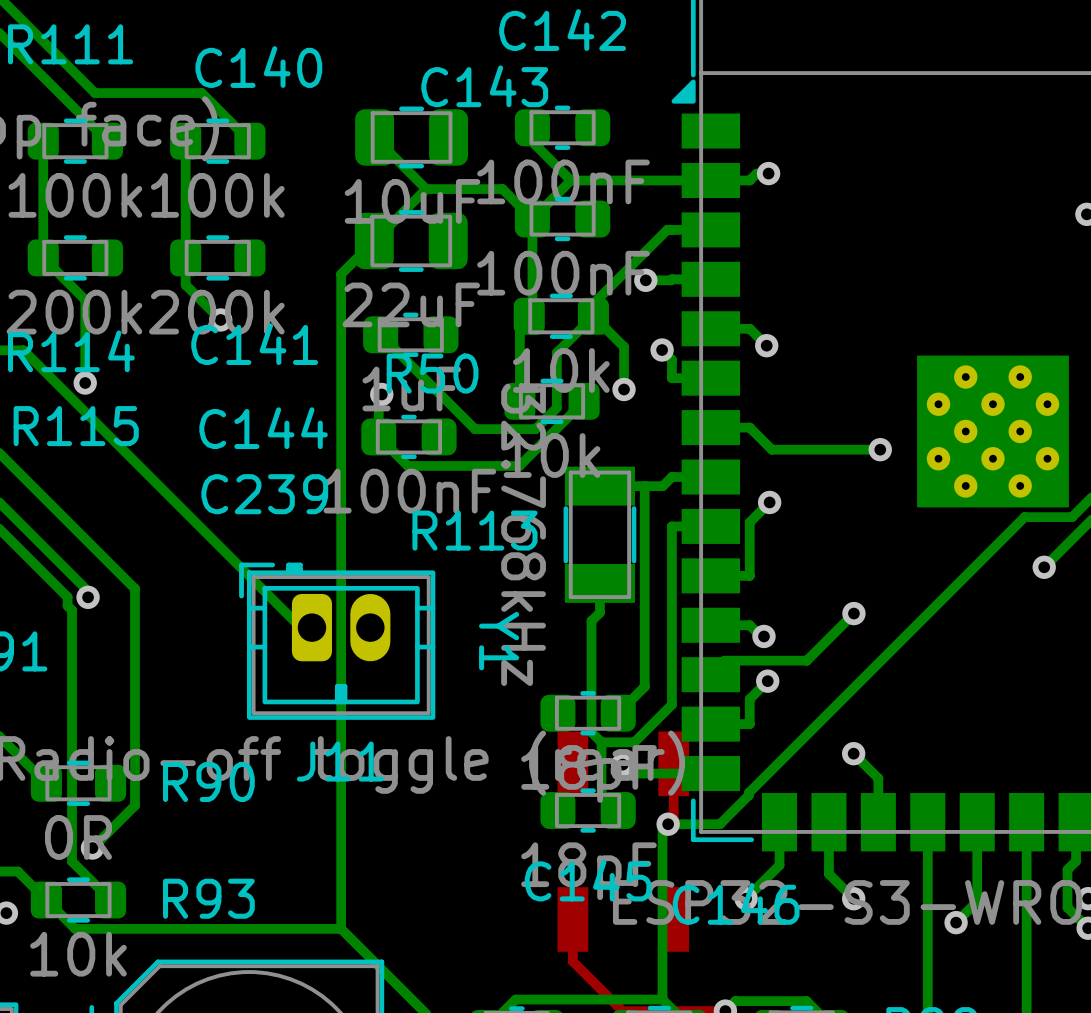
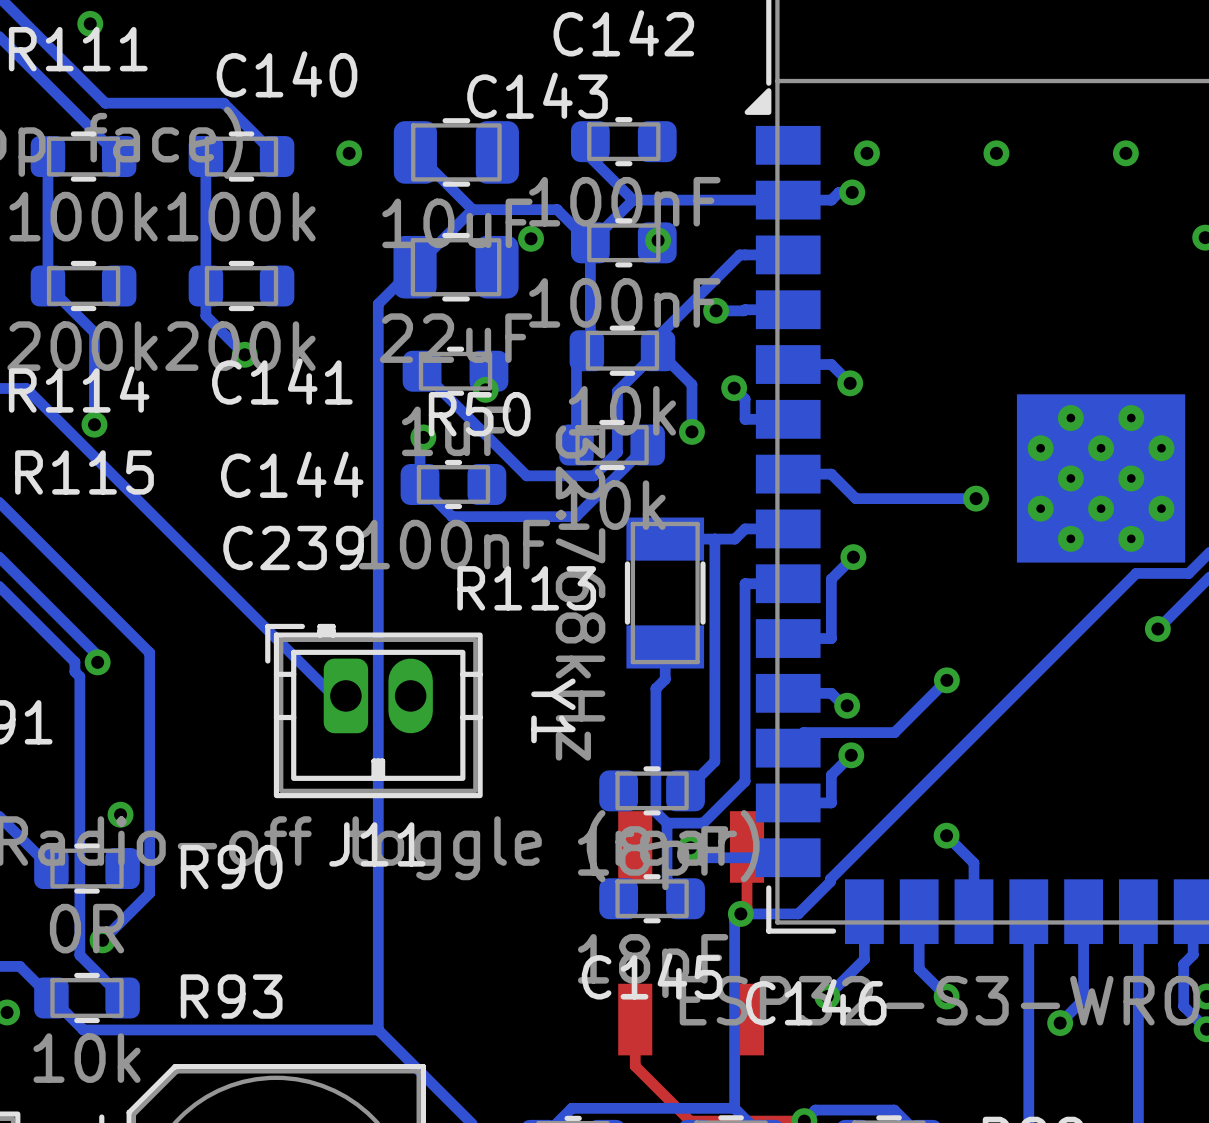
via: none -> (90, 23)
via: none -> (349, 153)
via: none -> (866, 153)
via: none -> (996, 153)
via: none -> (1125, 153)
via: none -> (531, 238)
via: none -> (658, 240)
via: none -> (485, 389)
via: none -> (120, 814)

